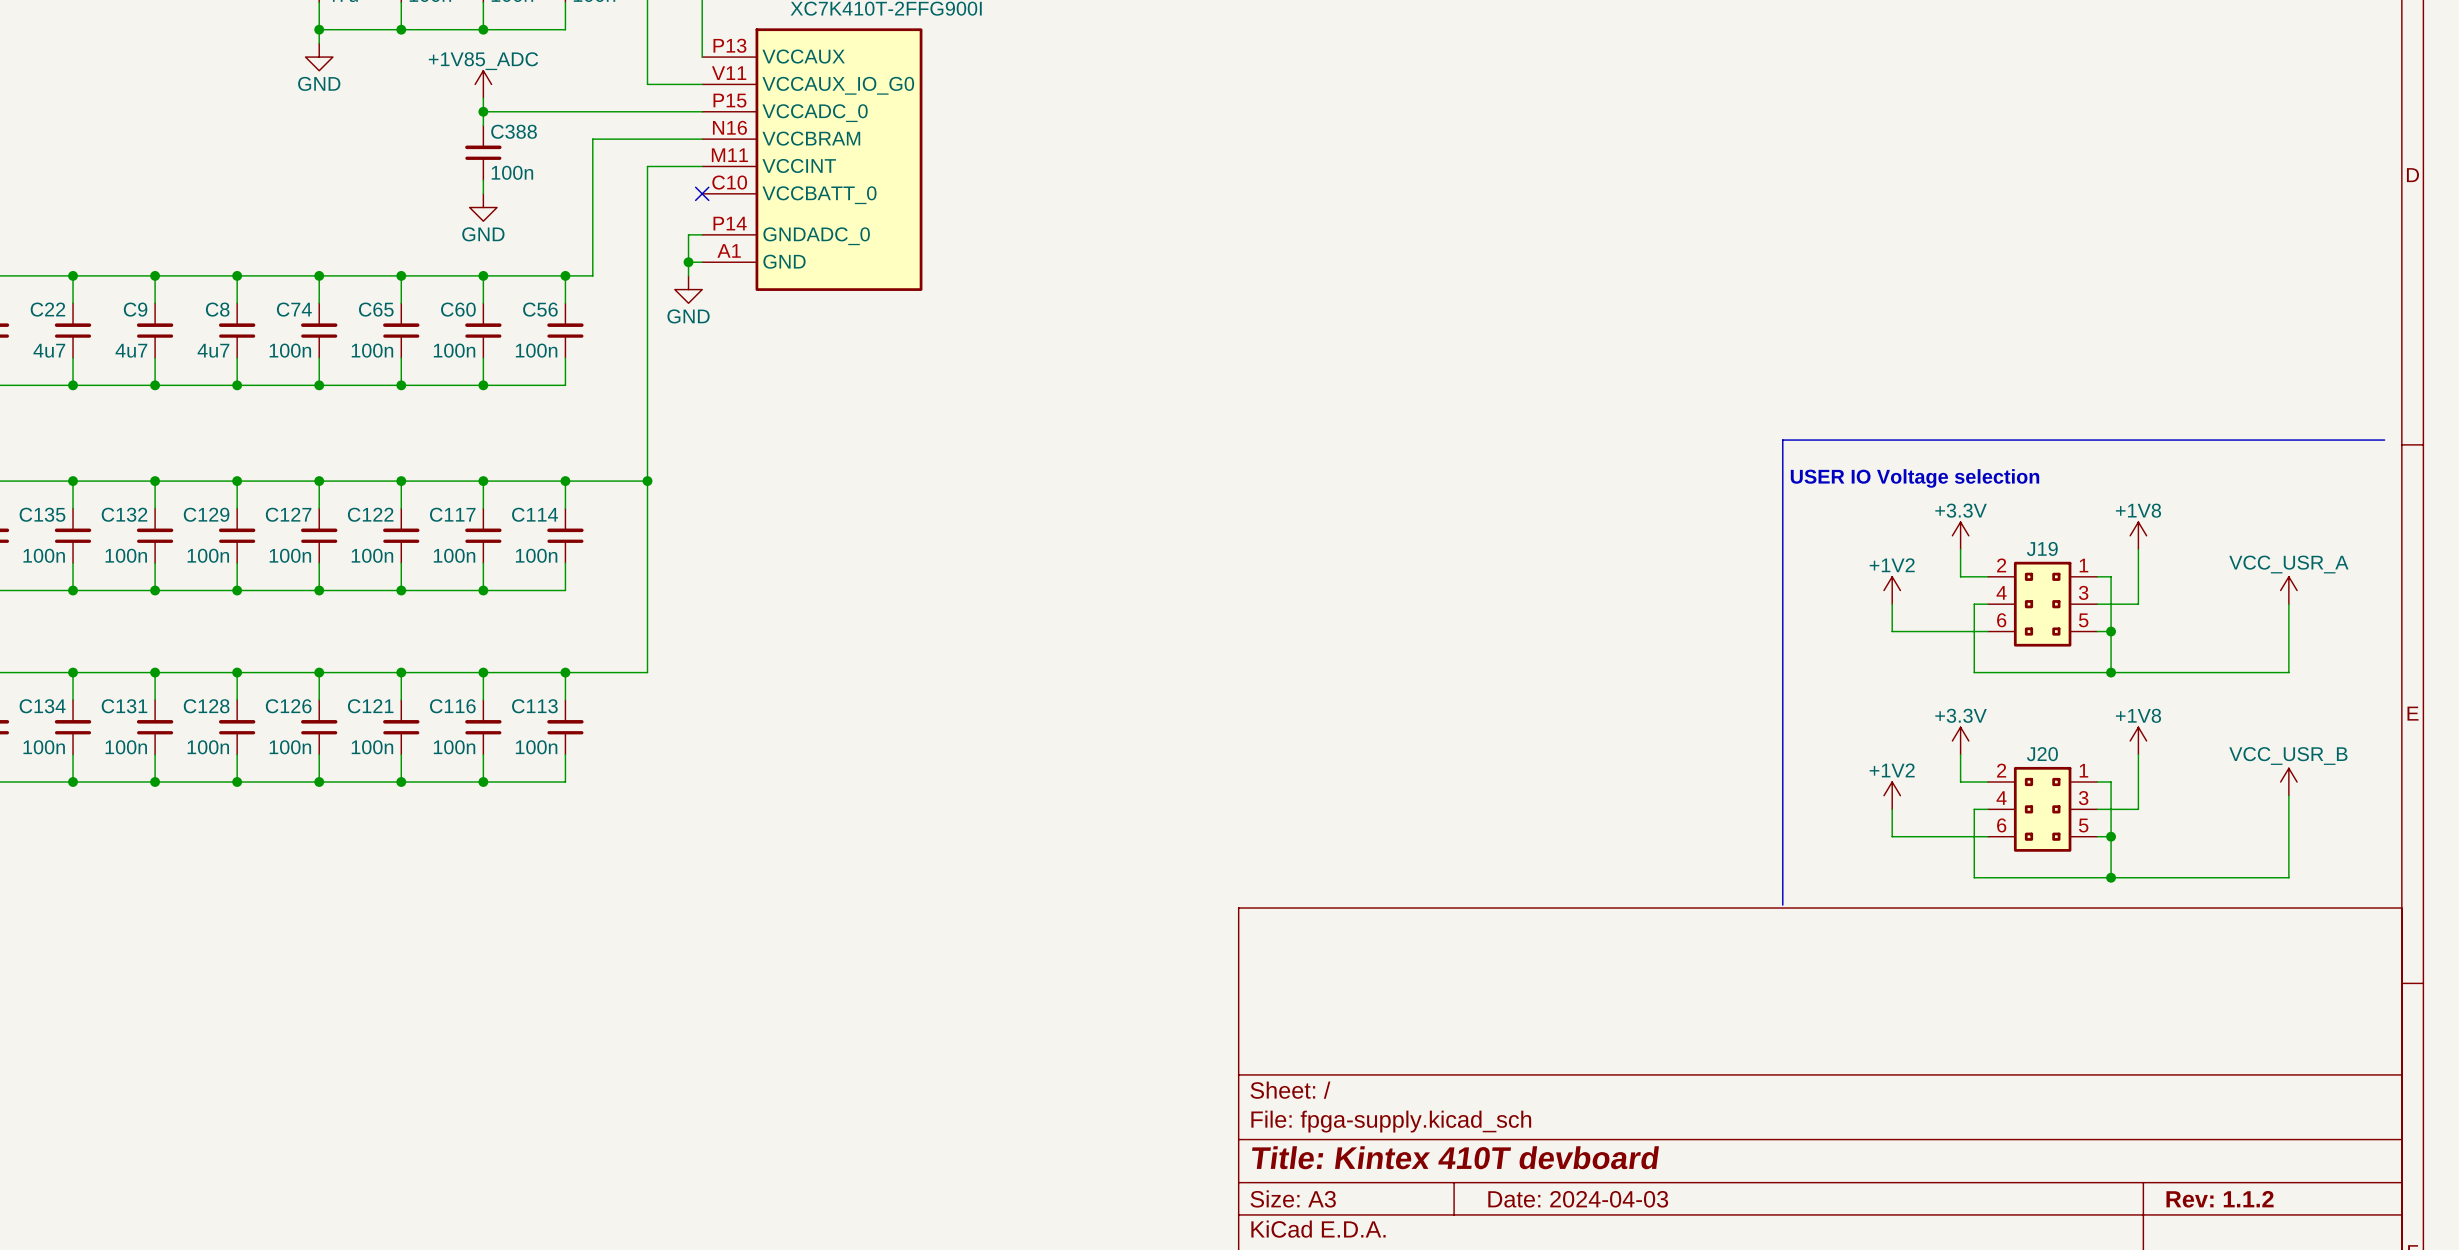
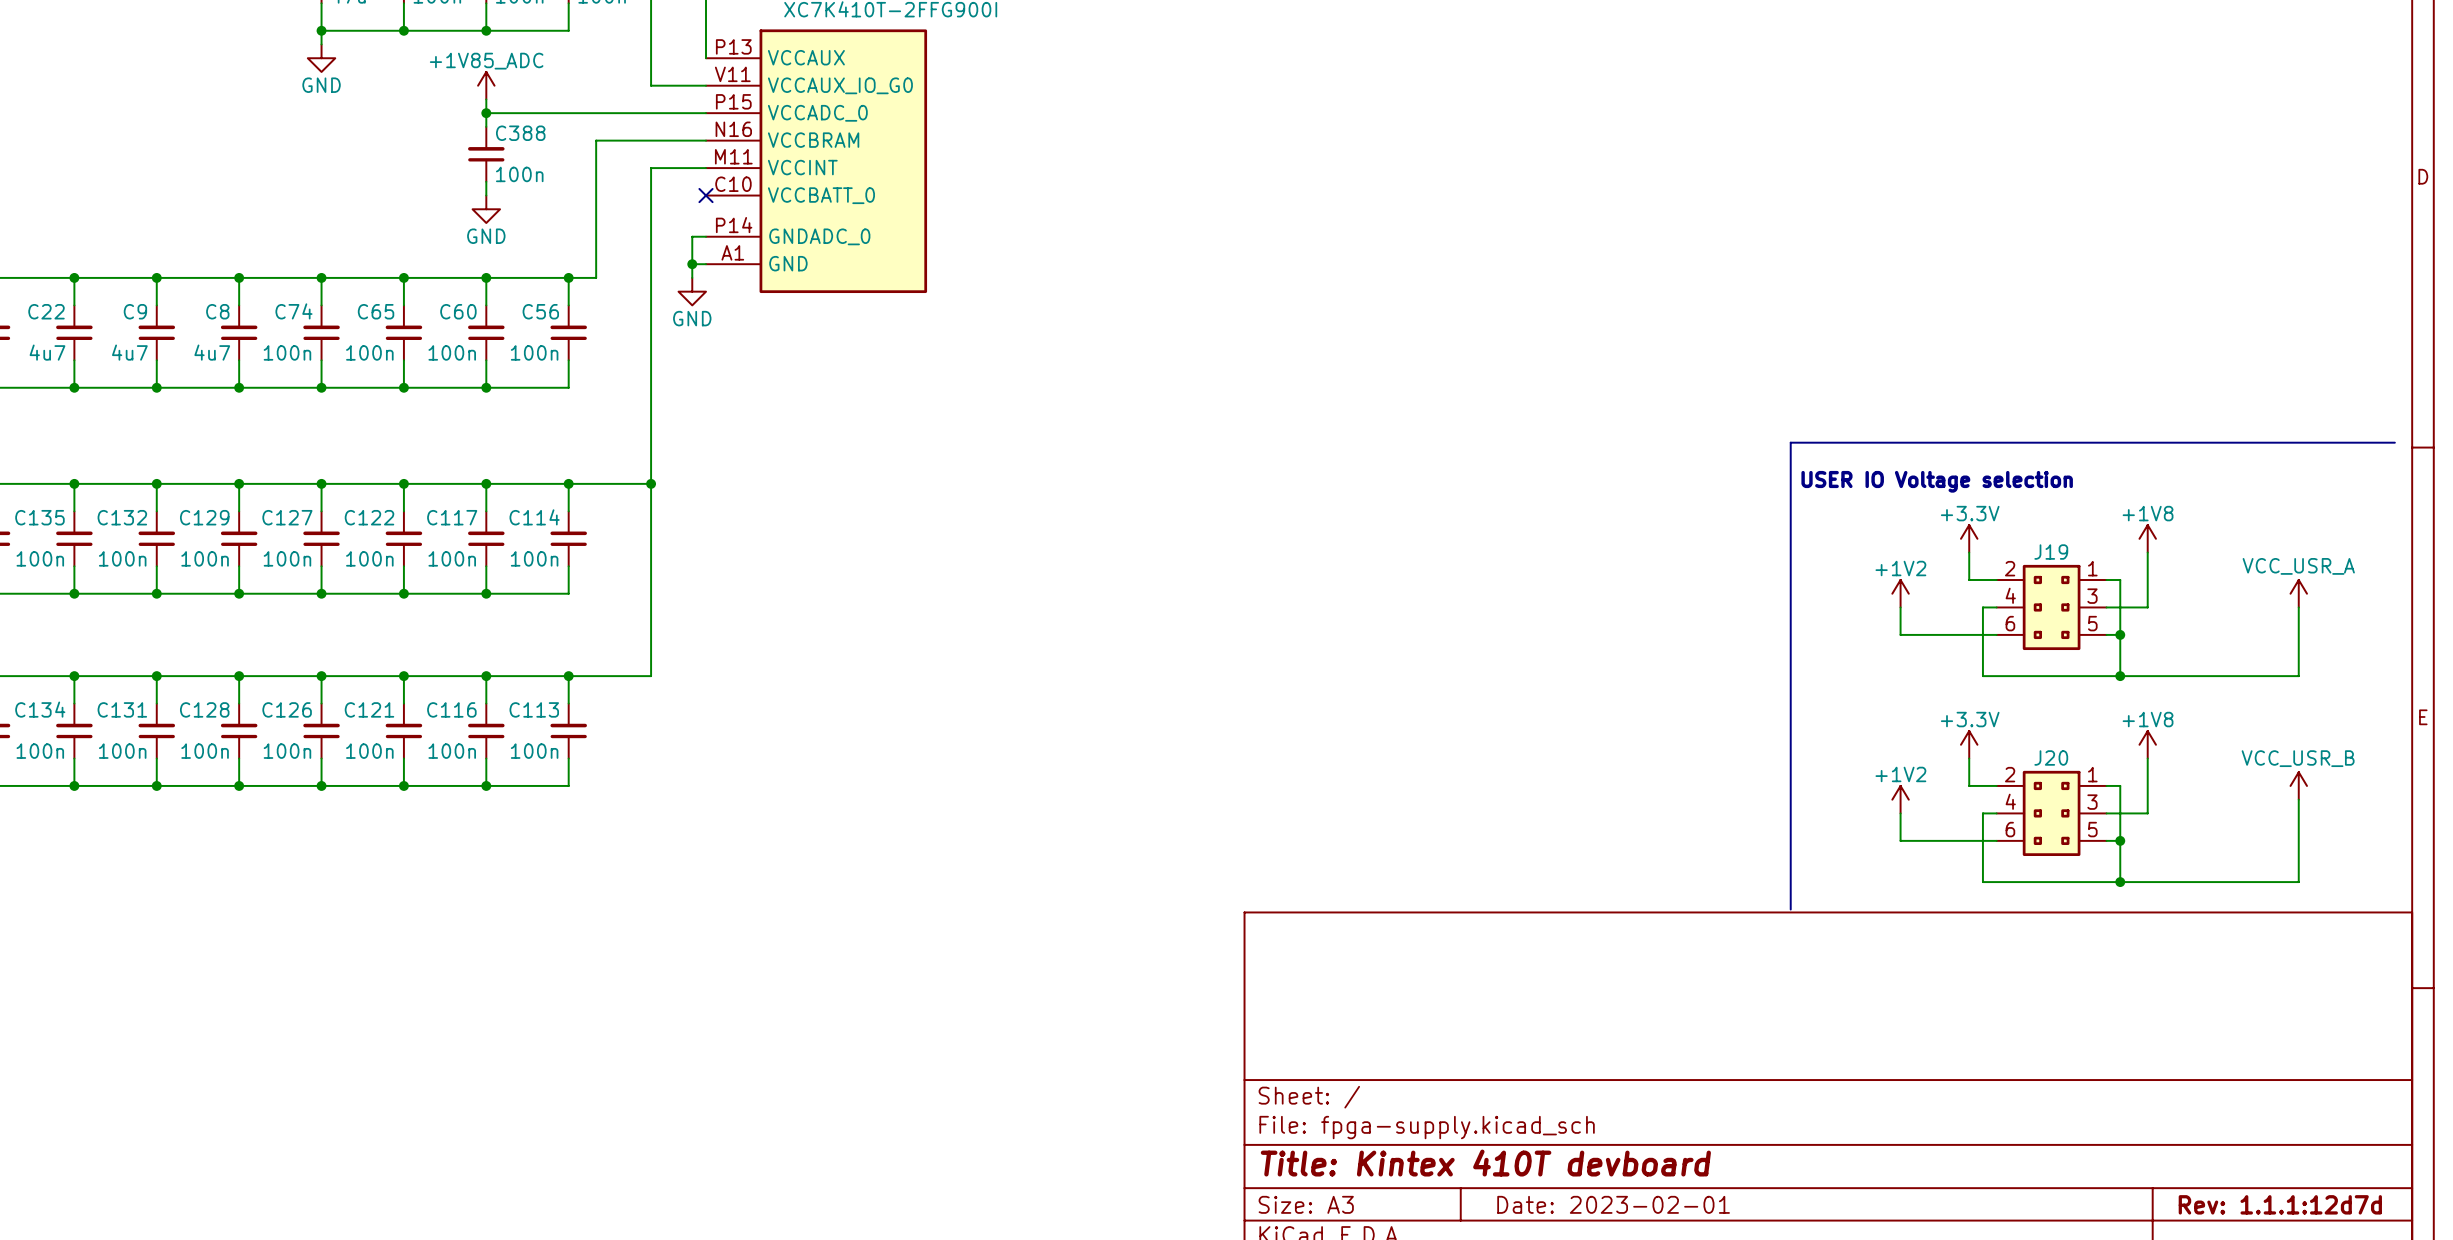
title block: Date: 2024-04-03 (1578, 1199) -> Date: 2023-02-01 (1613, 1204)
title block: Rev: 1.1.2 (2220, 1199) -> Rev: 1.1.1:12d7d (2280, 1204)

